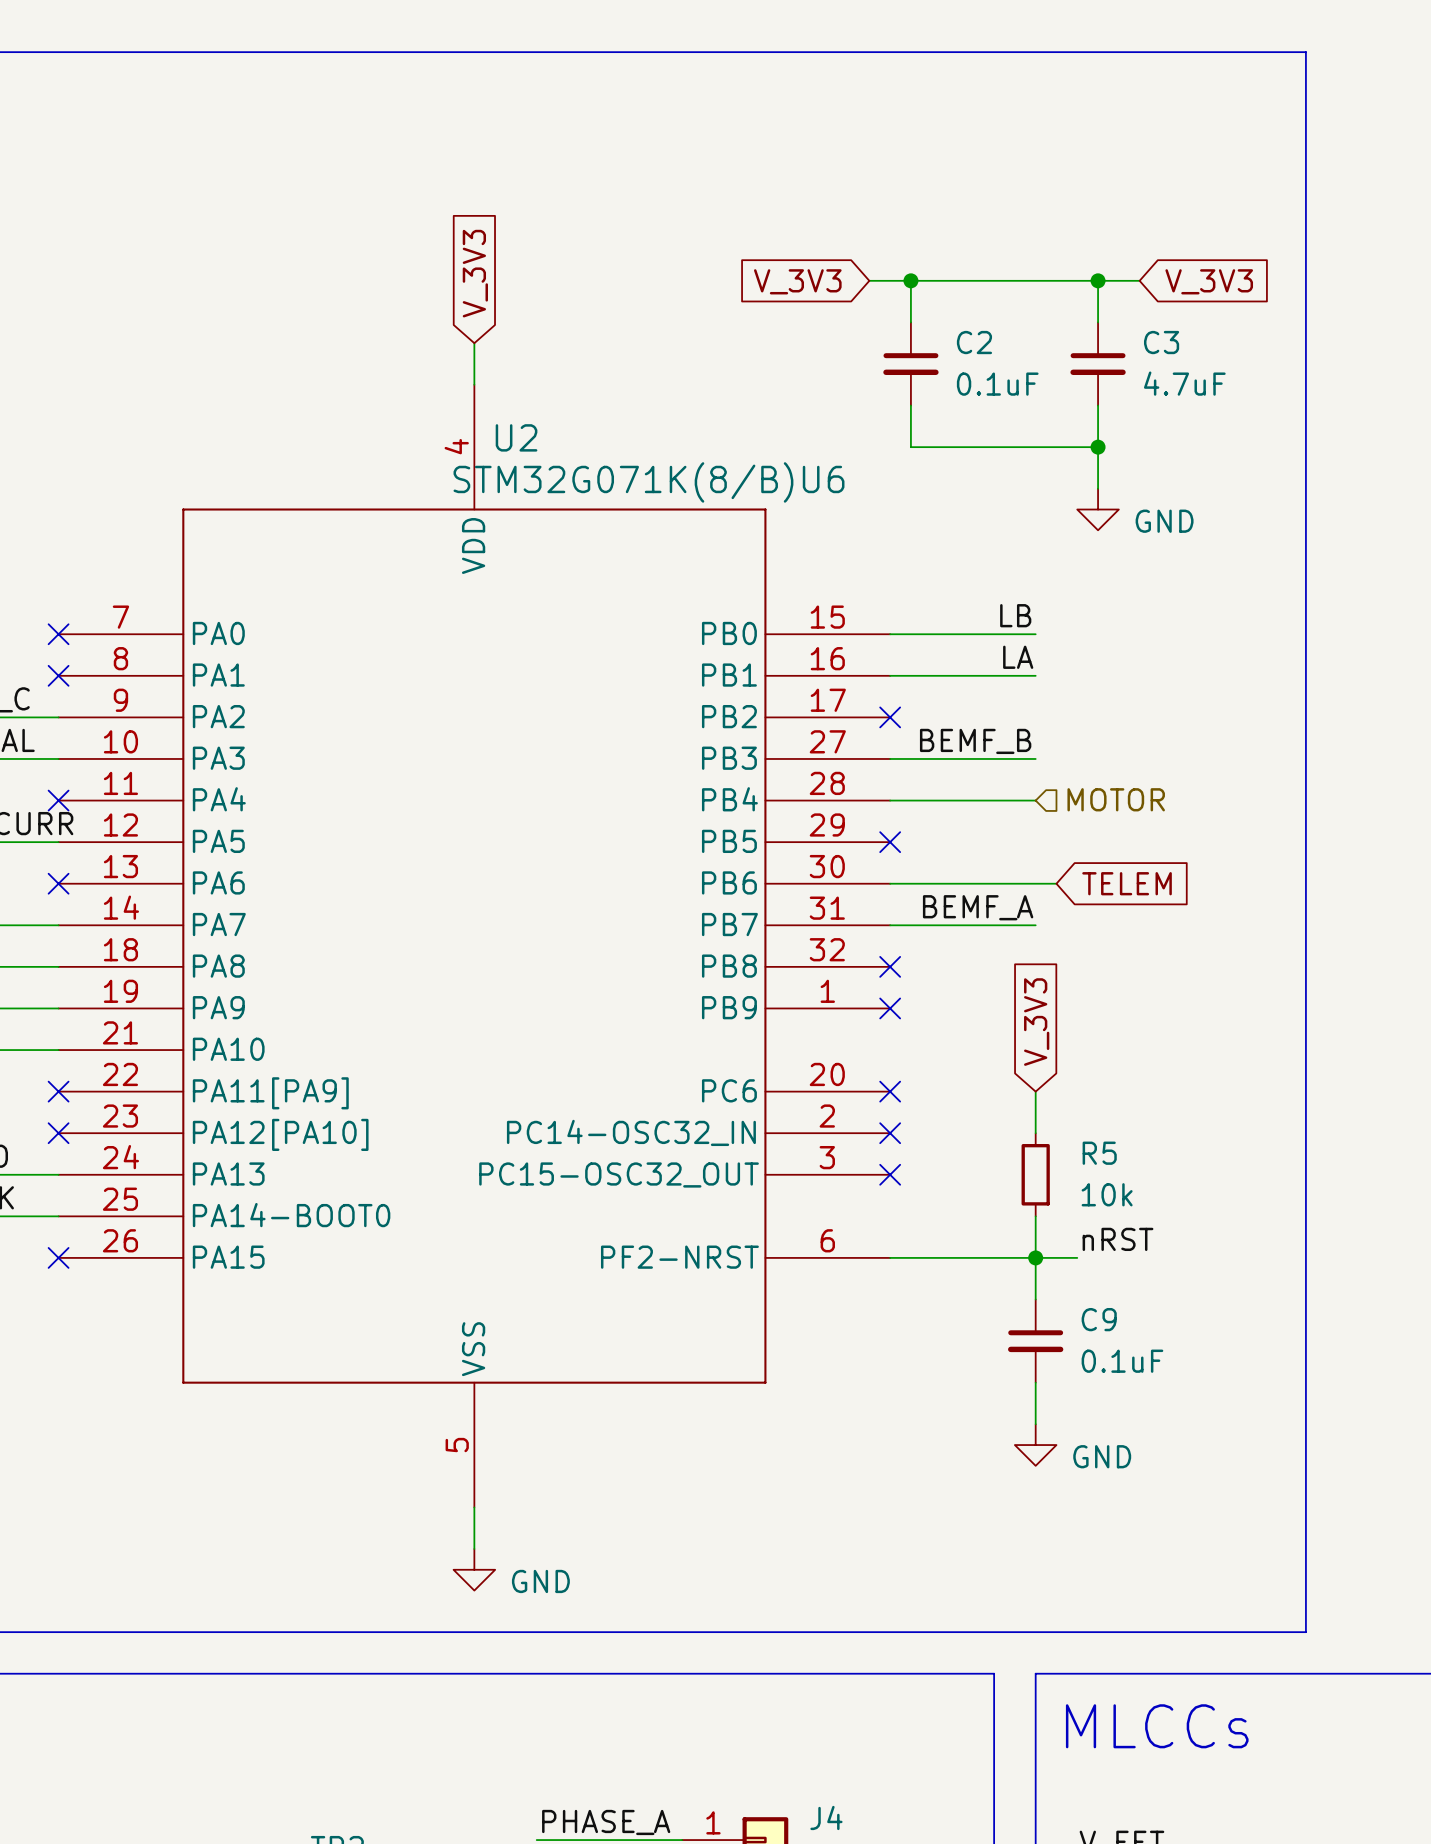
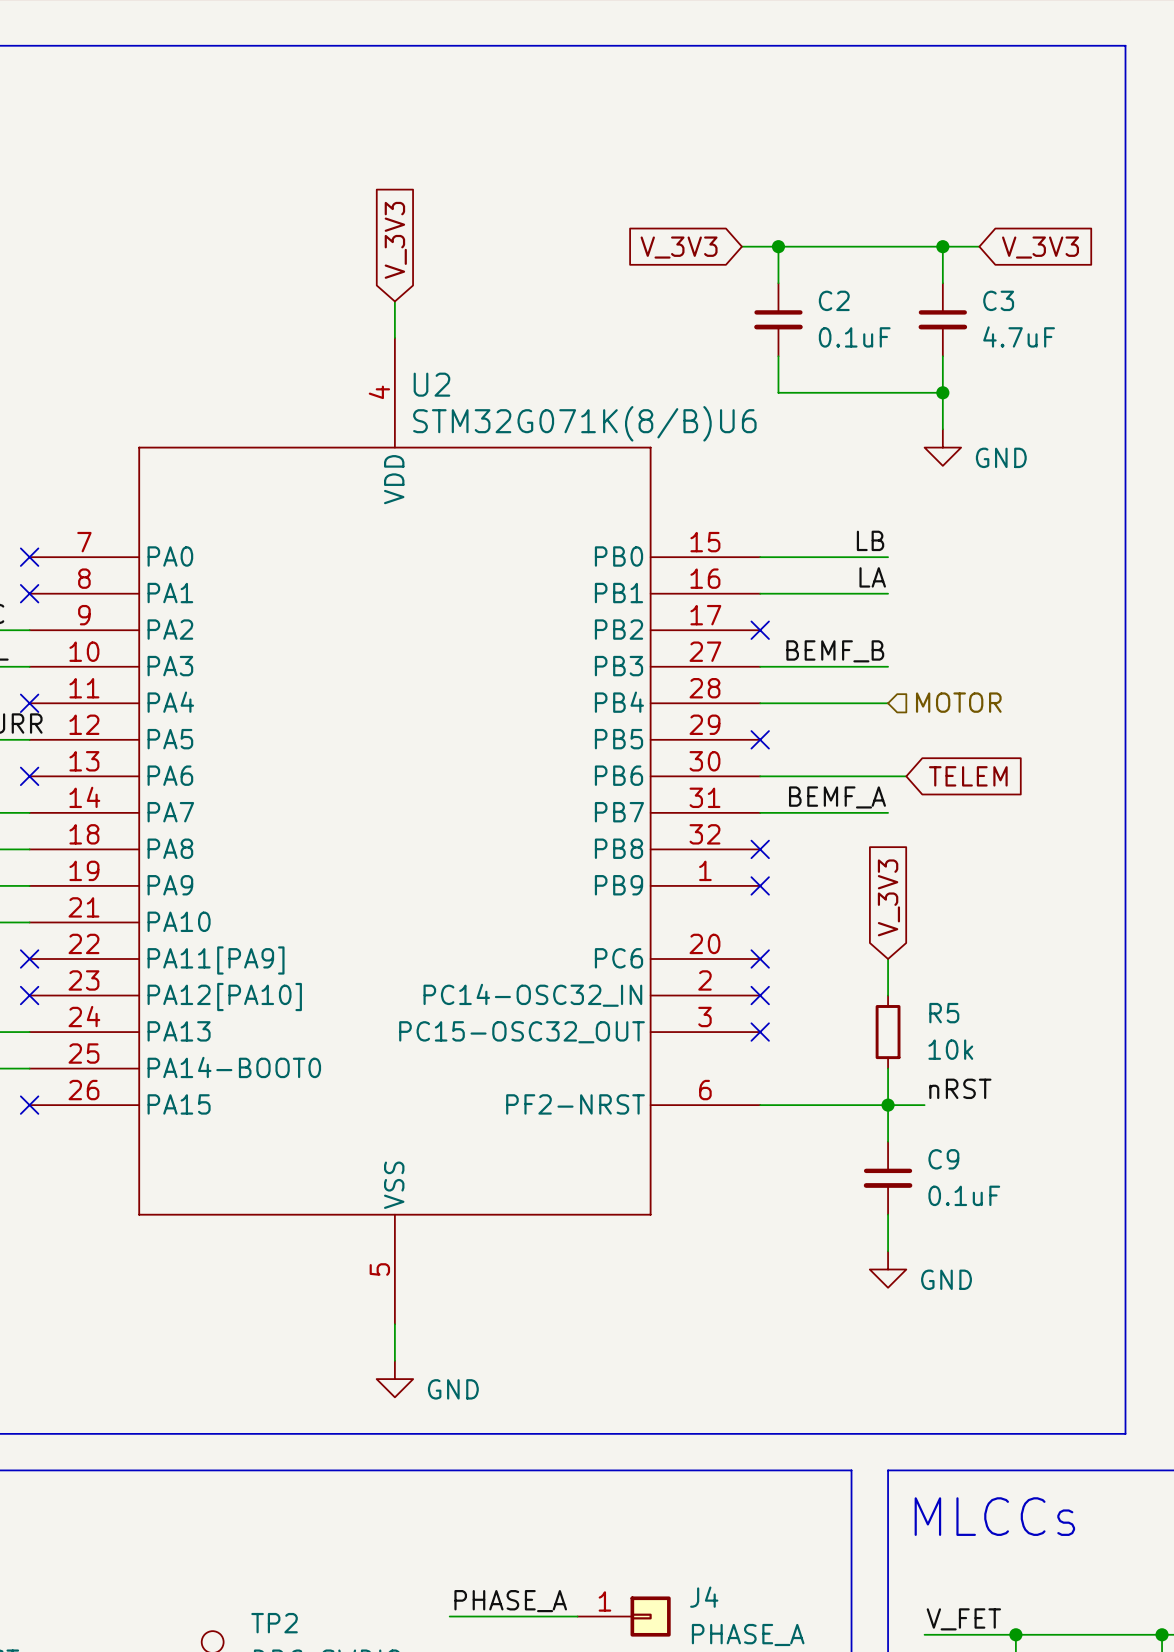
U2 value position: STM32G071K(8/B)U6 (649, 482) -> STM32G071K(8/B)U6 (584, 423)

